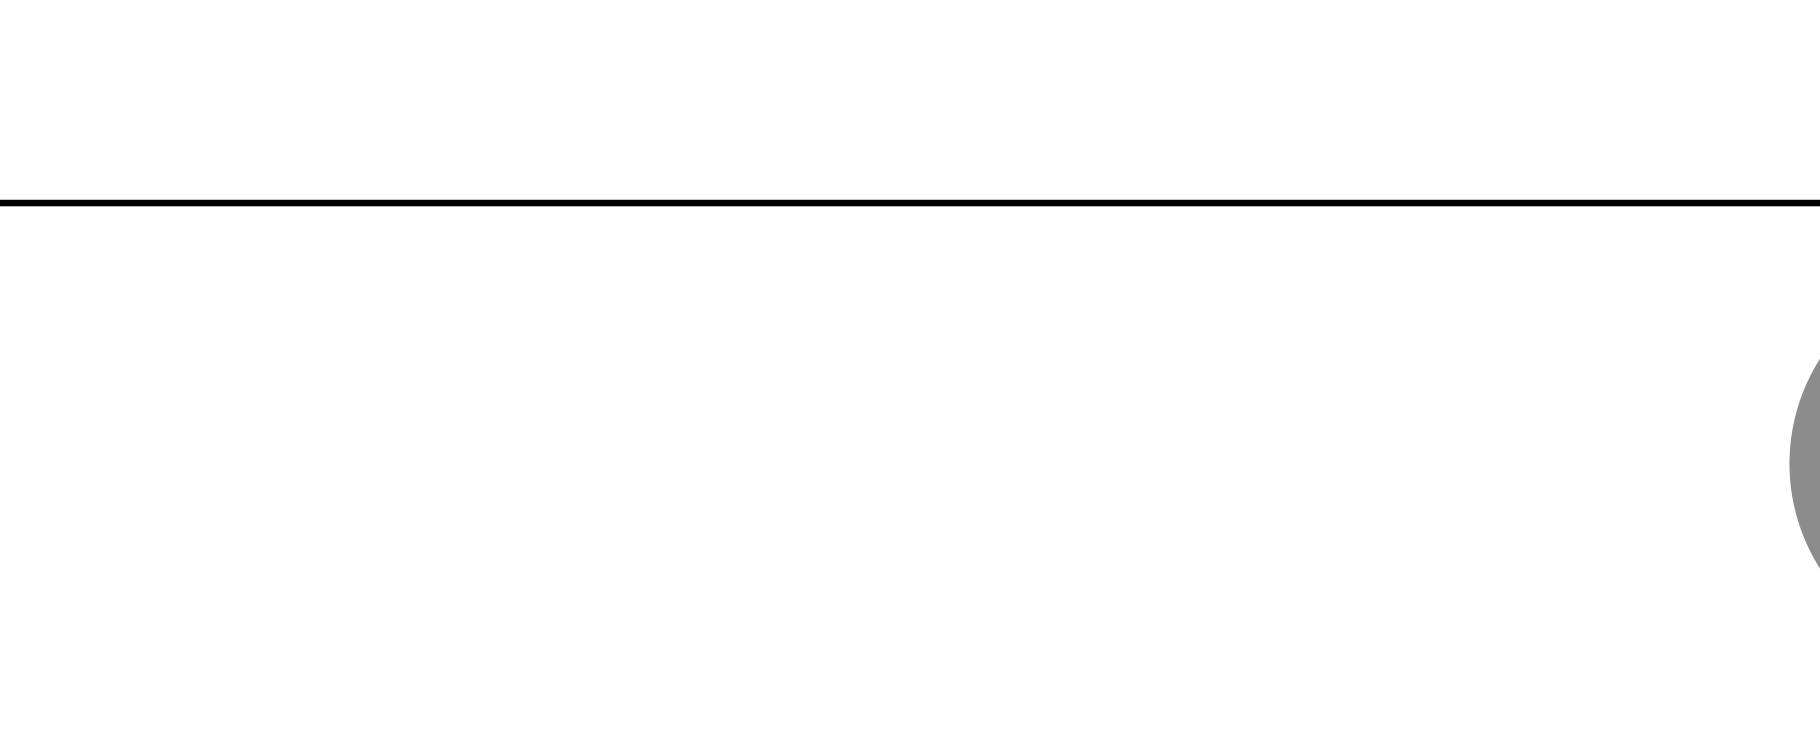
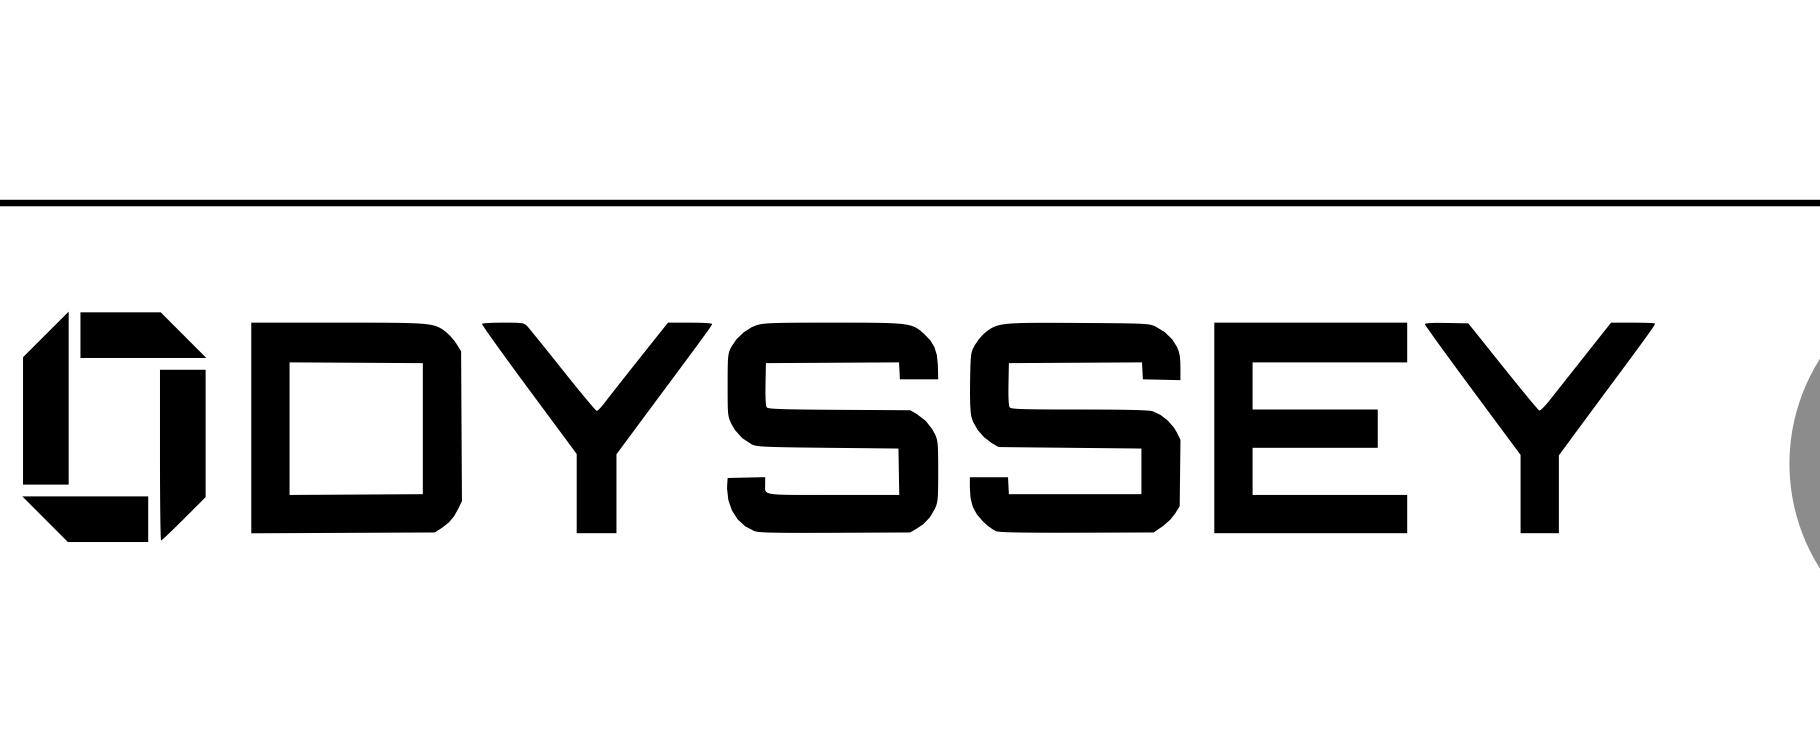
drawing: none -> [22, 311, 1655, 543]

